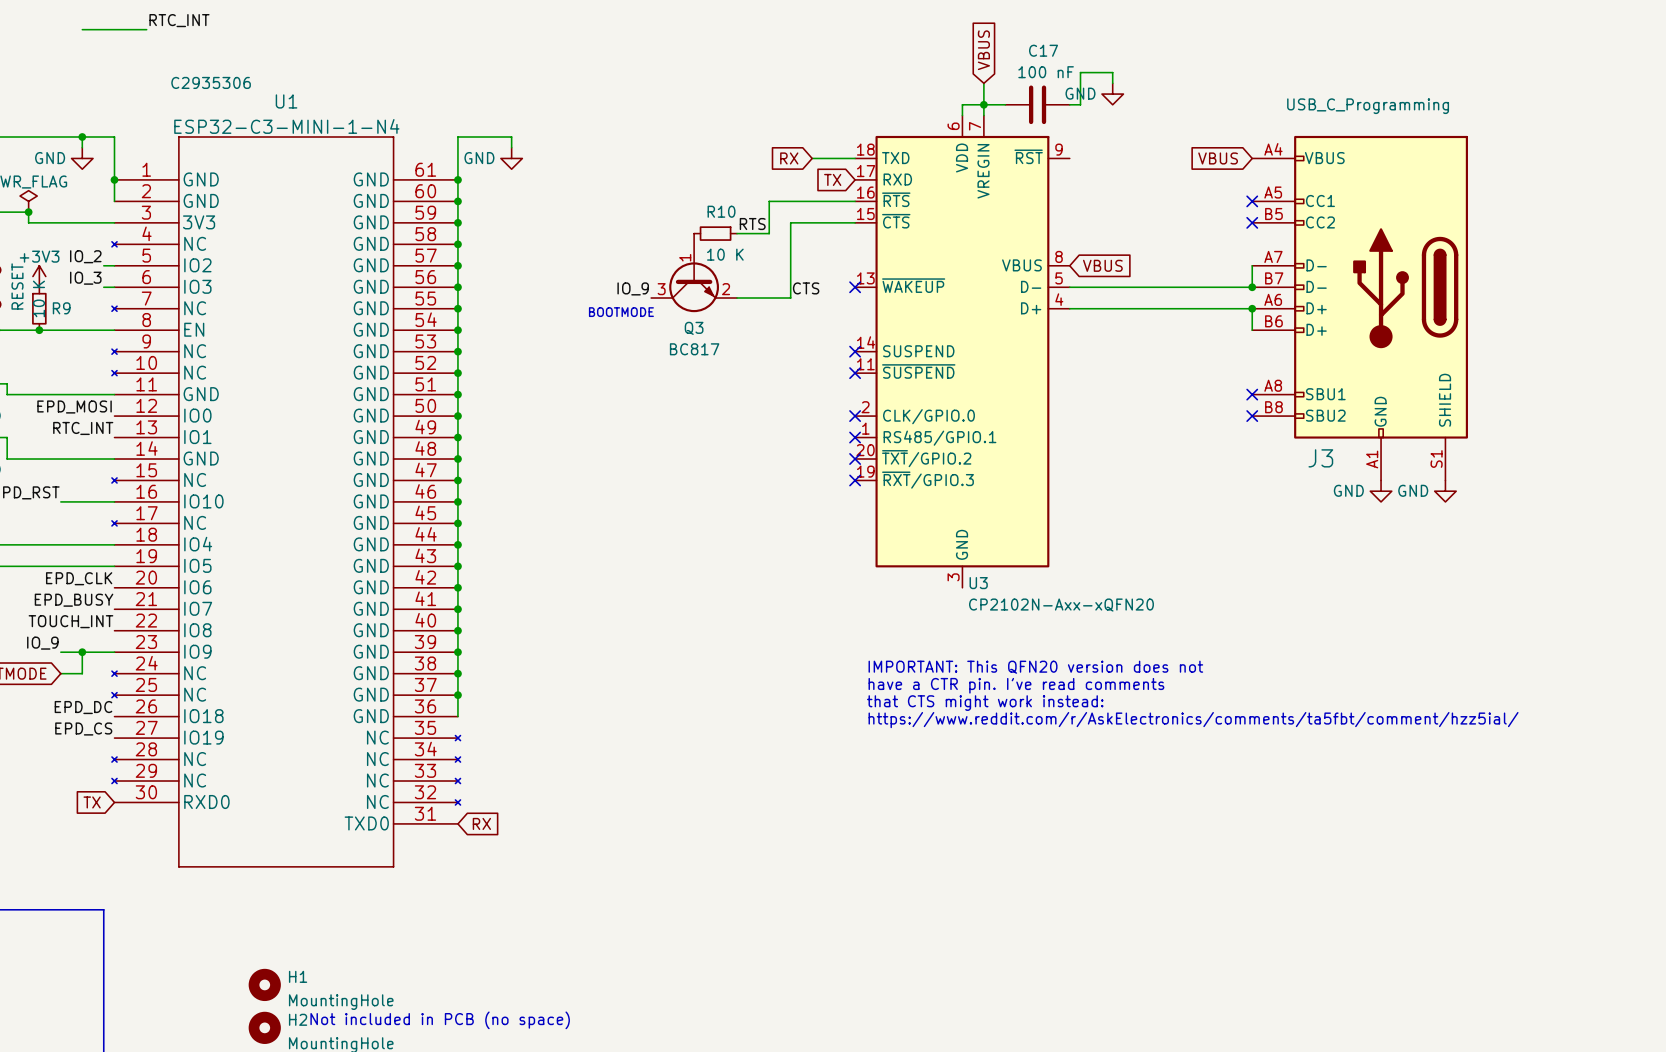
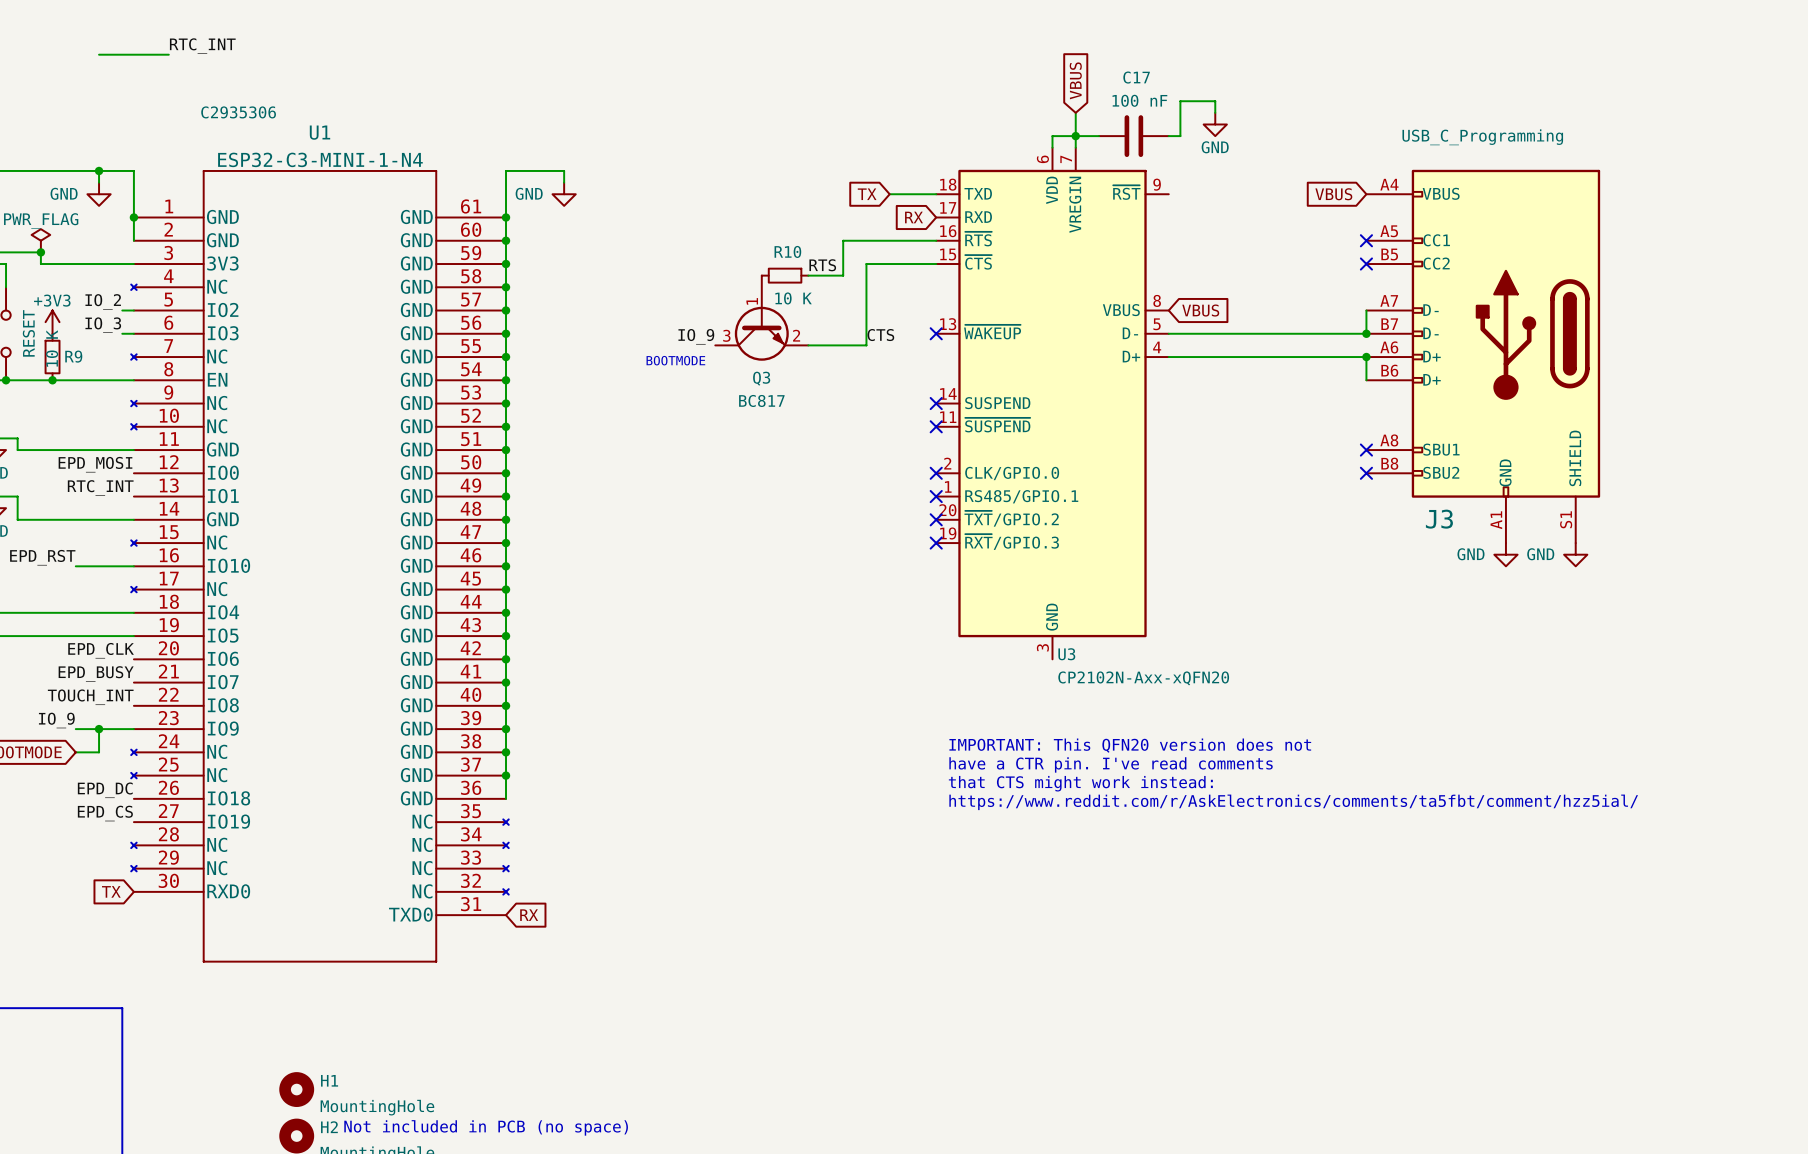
power symbol text position: GND (1080, 93) -> GND (1215, 147)
global label: RX (789, 158) -> TX (867, 194)
global label: TX (832, 179) -> RX (914, 217)

